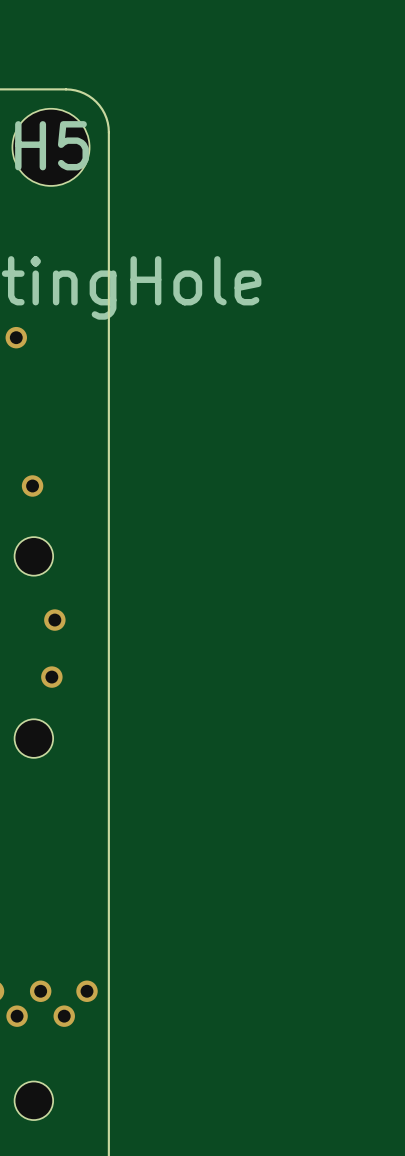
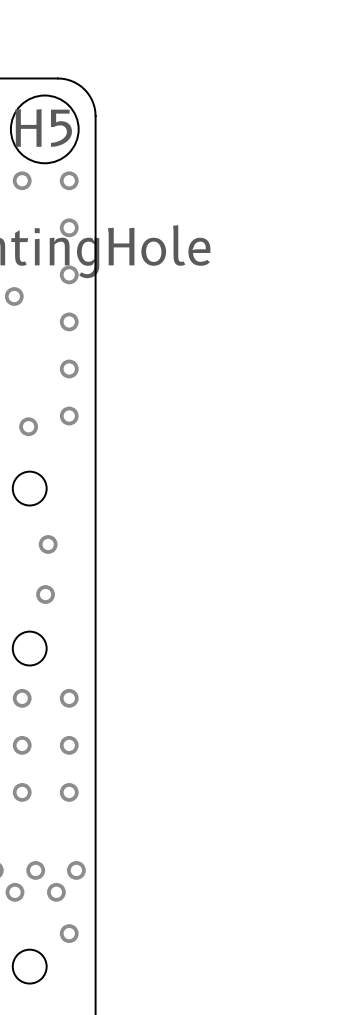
via: none -> (22, 180)
via: none -> (69, 180)
via: none -> (69, 227)
via: none -> (69, 274)
via: none -> (69, 321)
via: none -> (69, 368)
via: none -> (69, 416)
via: none -> (22, 698)
via: none -> (69, 698)
via: none -> (22, 745)
via: none -> (69, 745)
via: none -> (22, 792)
via: none -> (69, 792)
via: none -> (69, 933)

